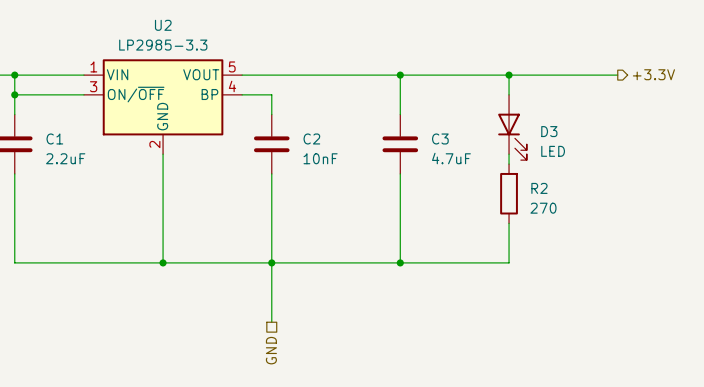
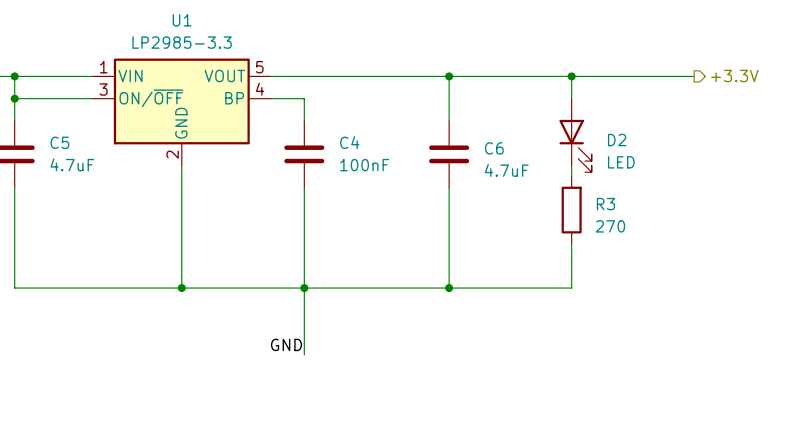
U2 name: U2 (163, 25) -> U1 (182, 20)
D3 name: D3 (549, 131) -> D2 (617, 140)
C1 name: C1 (54, 138) -> C5 (59, 142)
C2 name: C2 (311, 138) -> C4 (349, 142)
C3 name: C3 (440, 138) -> C6 (494, 148)
C1 value: 2.2uF (65, 158) -> 4.7uF (72, 164)
C2 value: 10nF (320, 158) -> 100nF (364, 165)
R2 name: R2 (539, 188) -> R3 (605, 204)
label: none -> GND (286, 344)
hierarchical label: GND (271, 350) -> none

